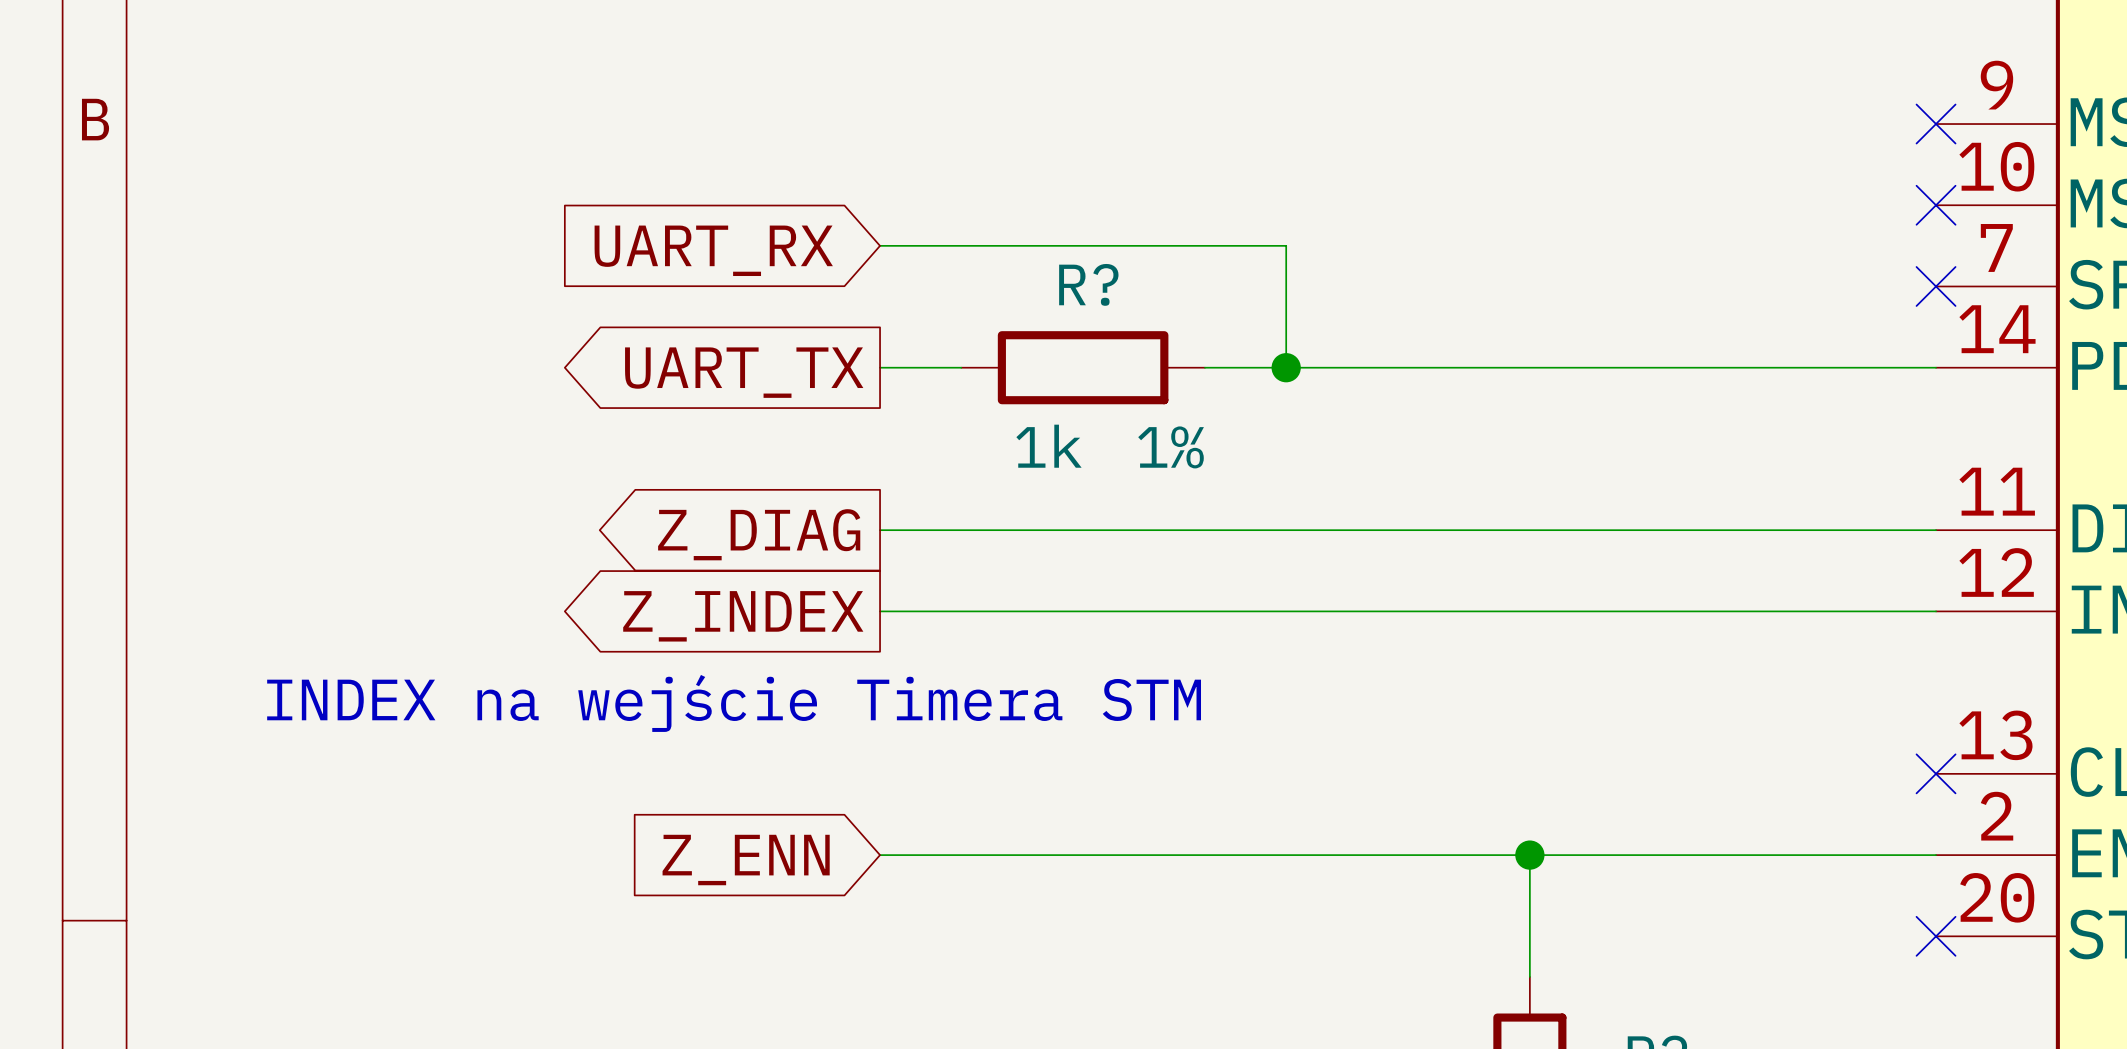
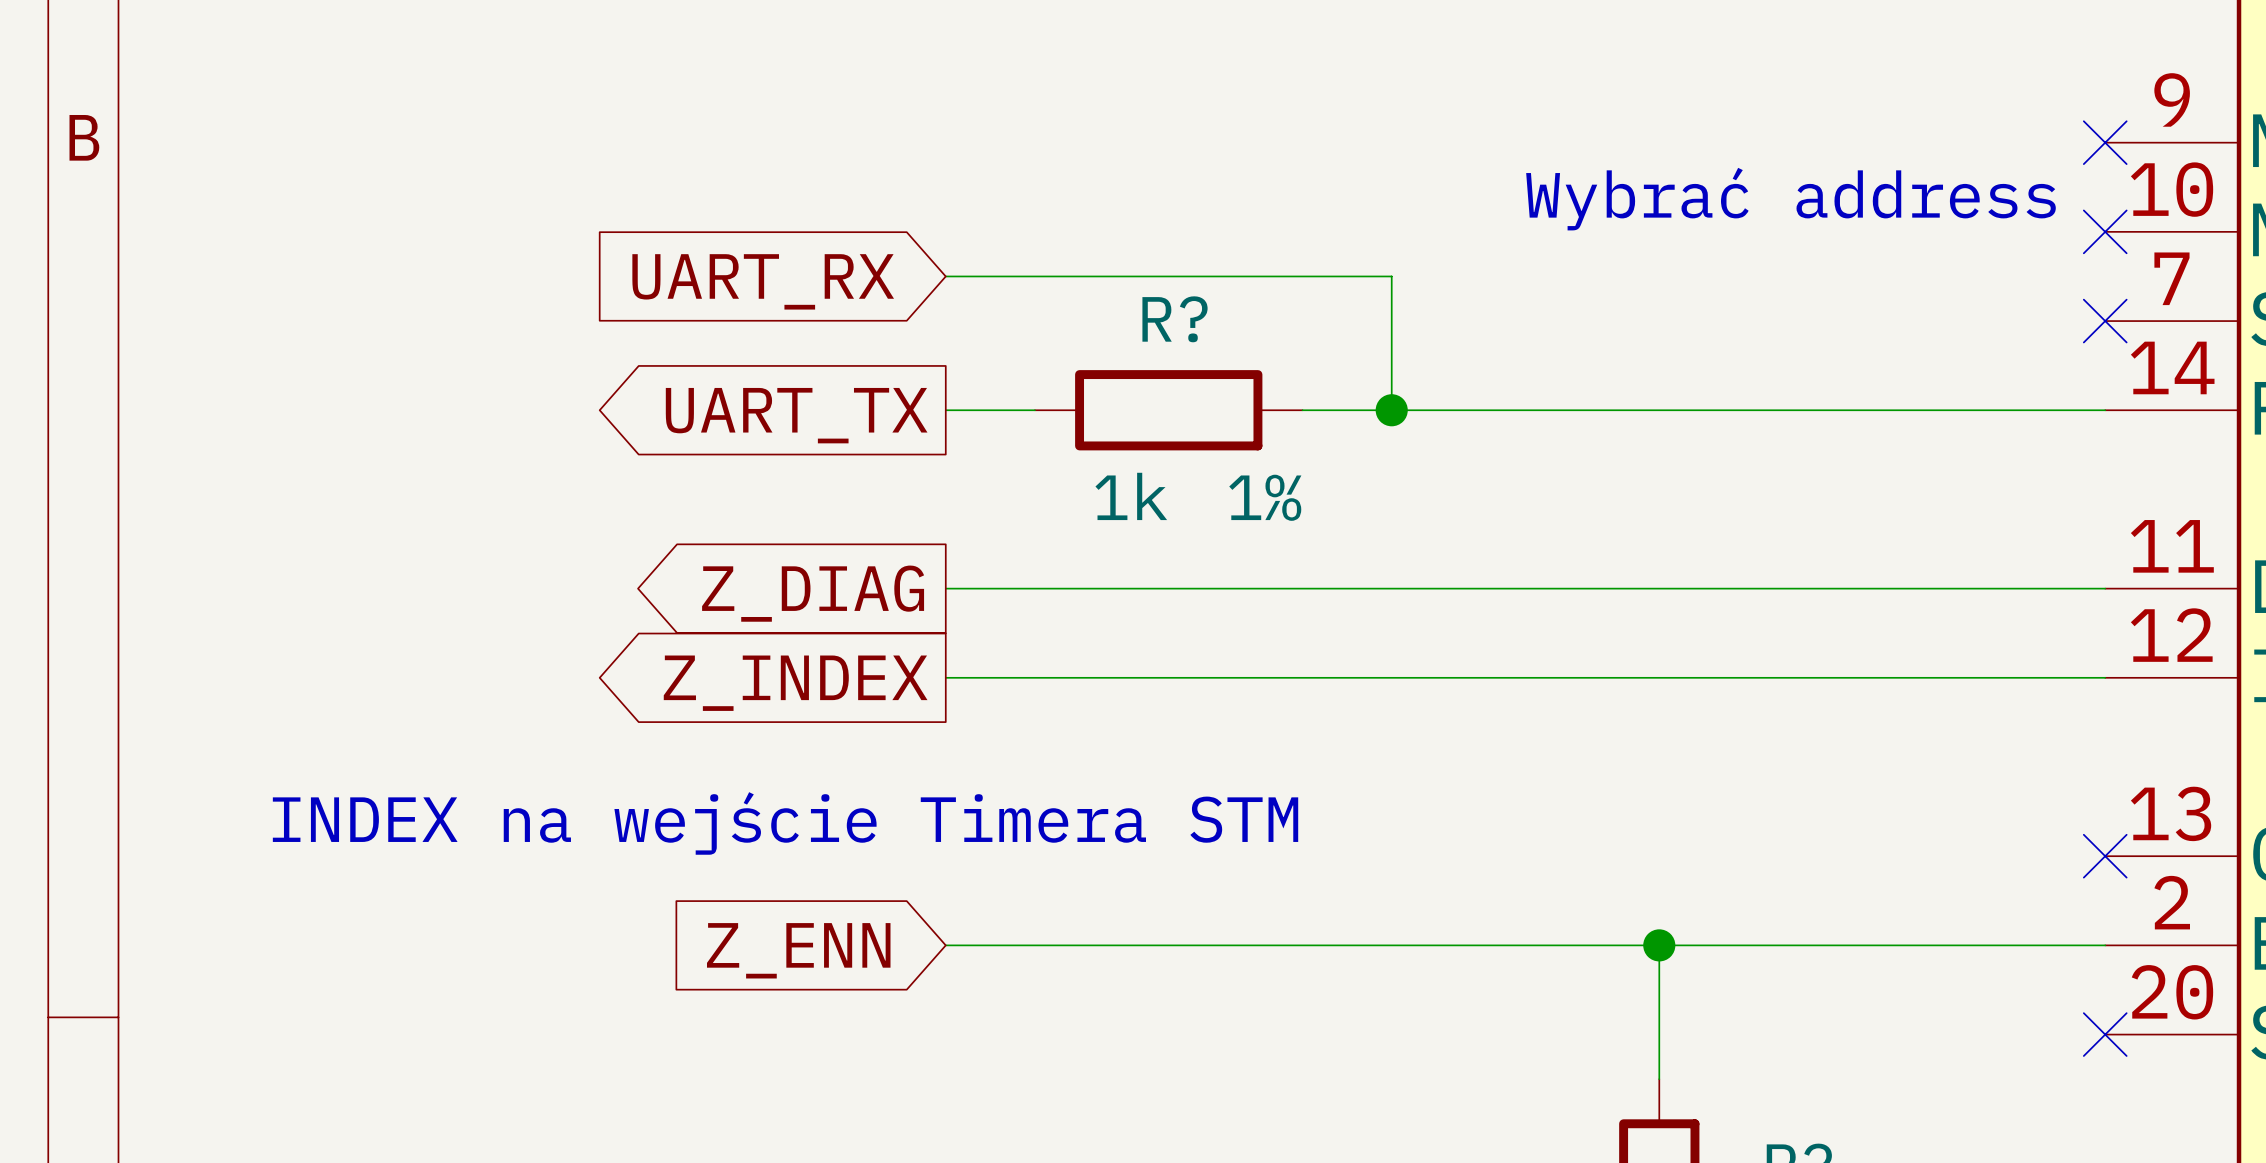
text: none -> Wybrać address (1790, 199)
text position: INDEX na wejście Timera STM (734, 703) -> INDEX na wejście Timera STM (785, 823)

